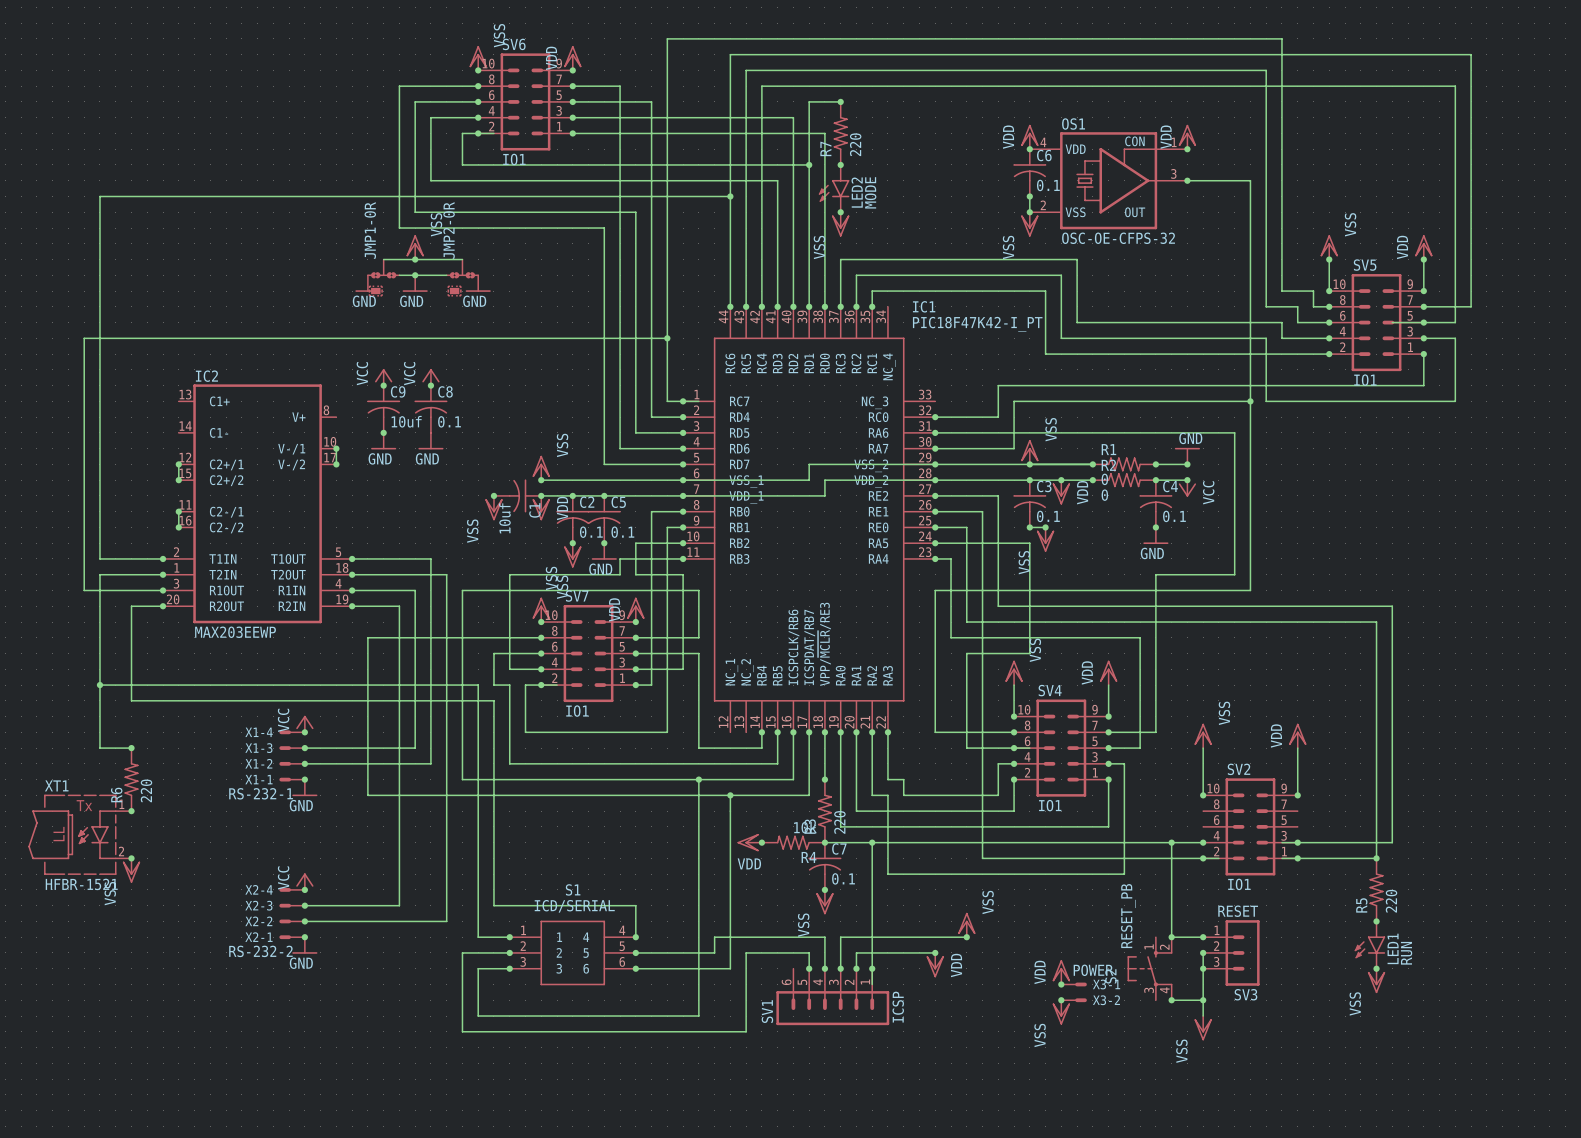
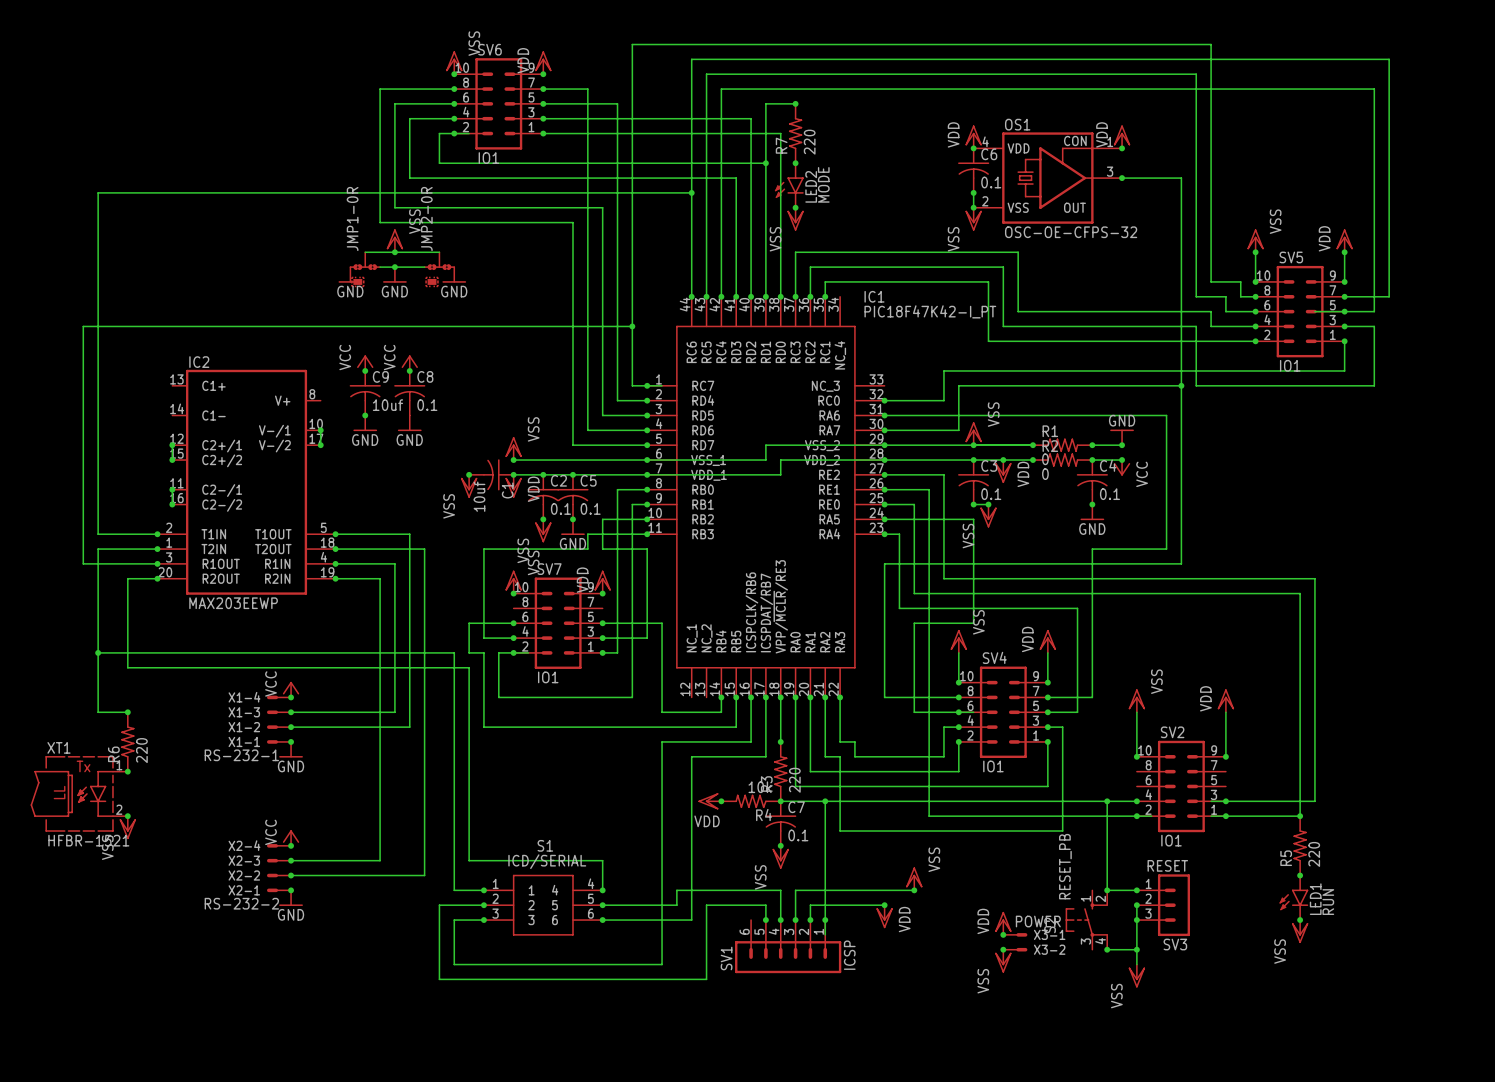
wire: (541, 637) (367, 637) (367, 795) (730, 795) -> none
junction: (541, 637) -> none
wire: (635, 637) (698, 637) (698, 590) (462, 590) (462, 779) (698, 779) -> none
junction: (635, 637) -> none
junction: (698, 779) -> none
junction: (730, 795) -> none

